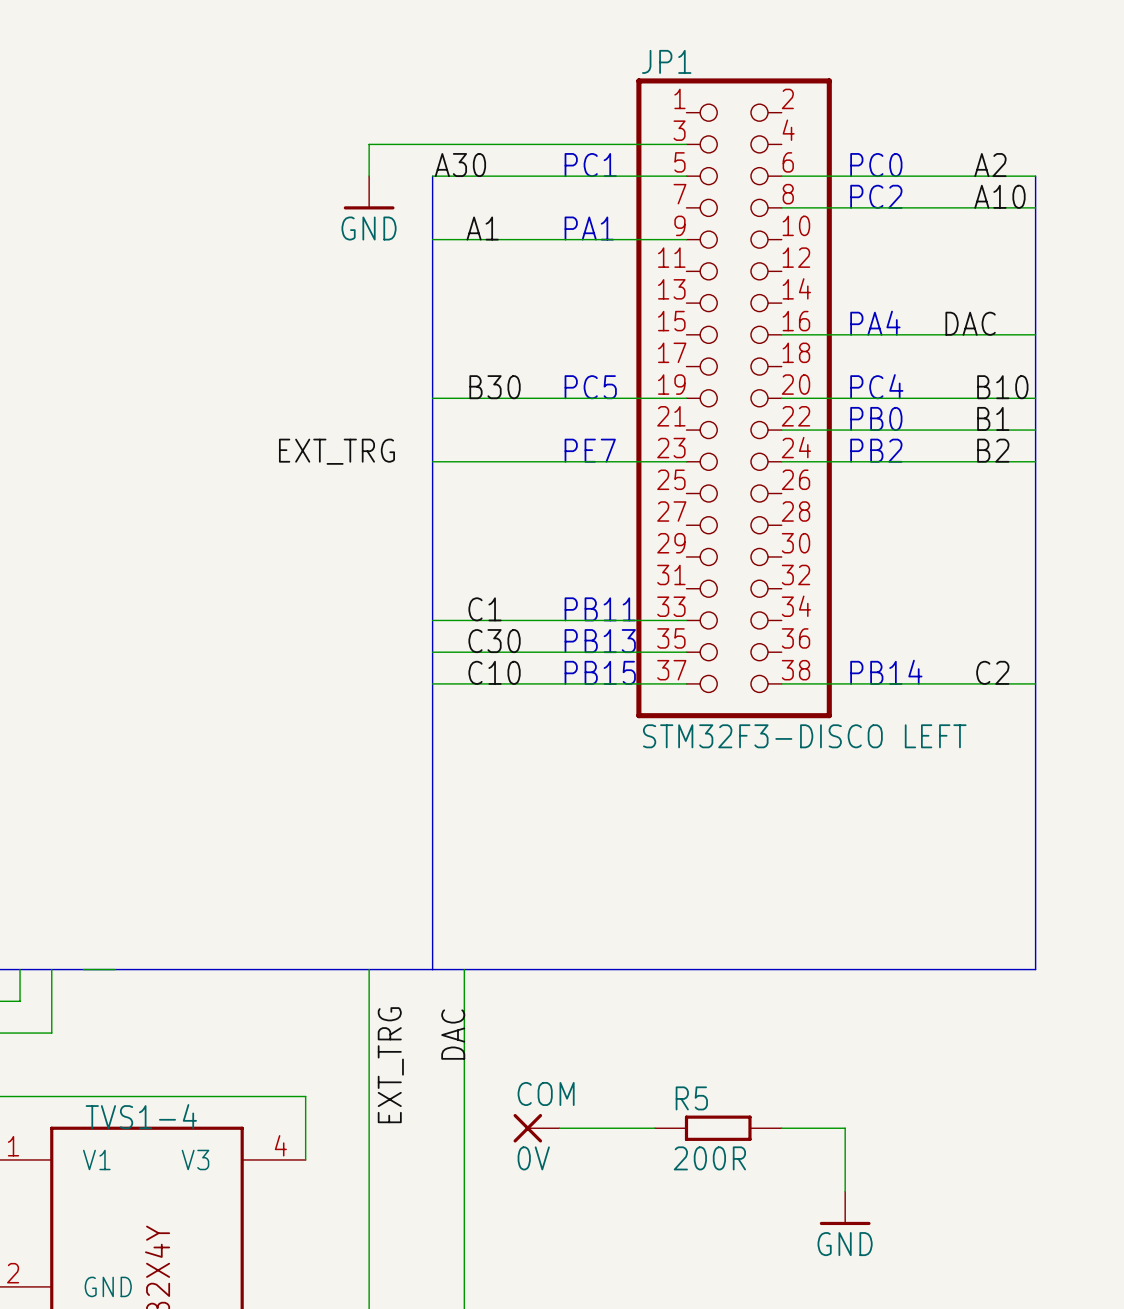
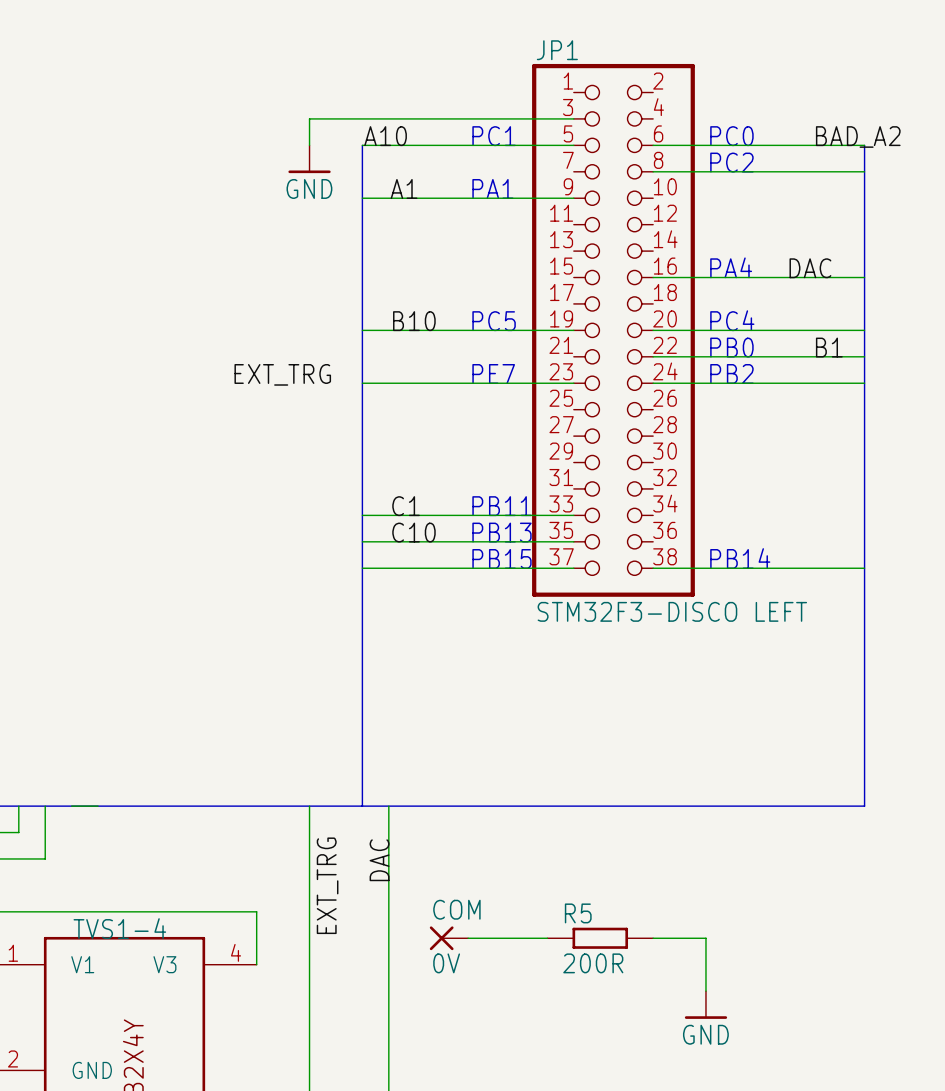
label: A30 (460, 165) -> A10 (385, 136)
label: A2 (990, 165) -> BAD_A2 (858, 137)
label: A10 (999, 196) -> none
label: B30 (495, 387) -> B10 (414, 321)
label: B10 (1002, 387) -> none
label: B2 (993, 450) -> none
label: C30 (494, 641) -> C10 (413, 532)
label: C10 (494, 672) -> none
label: C2 (992, 672) -> none

